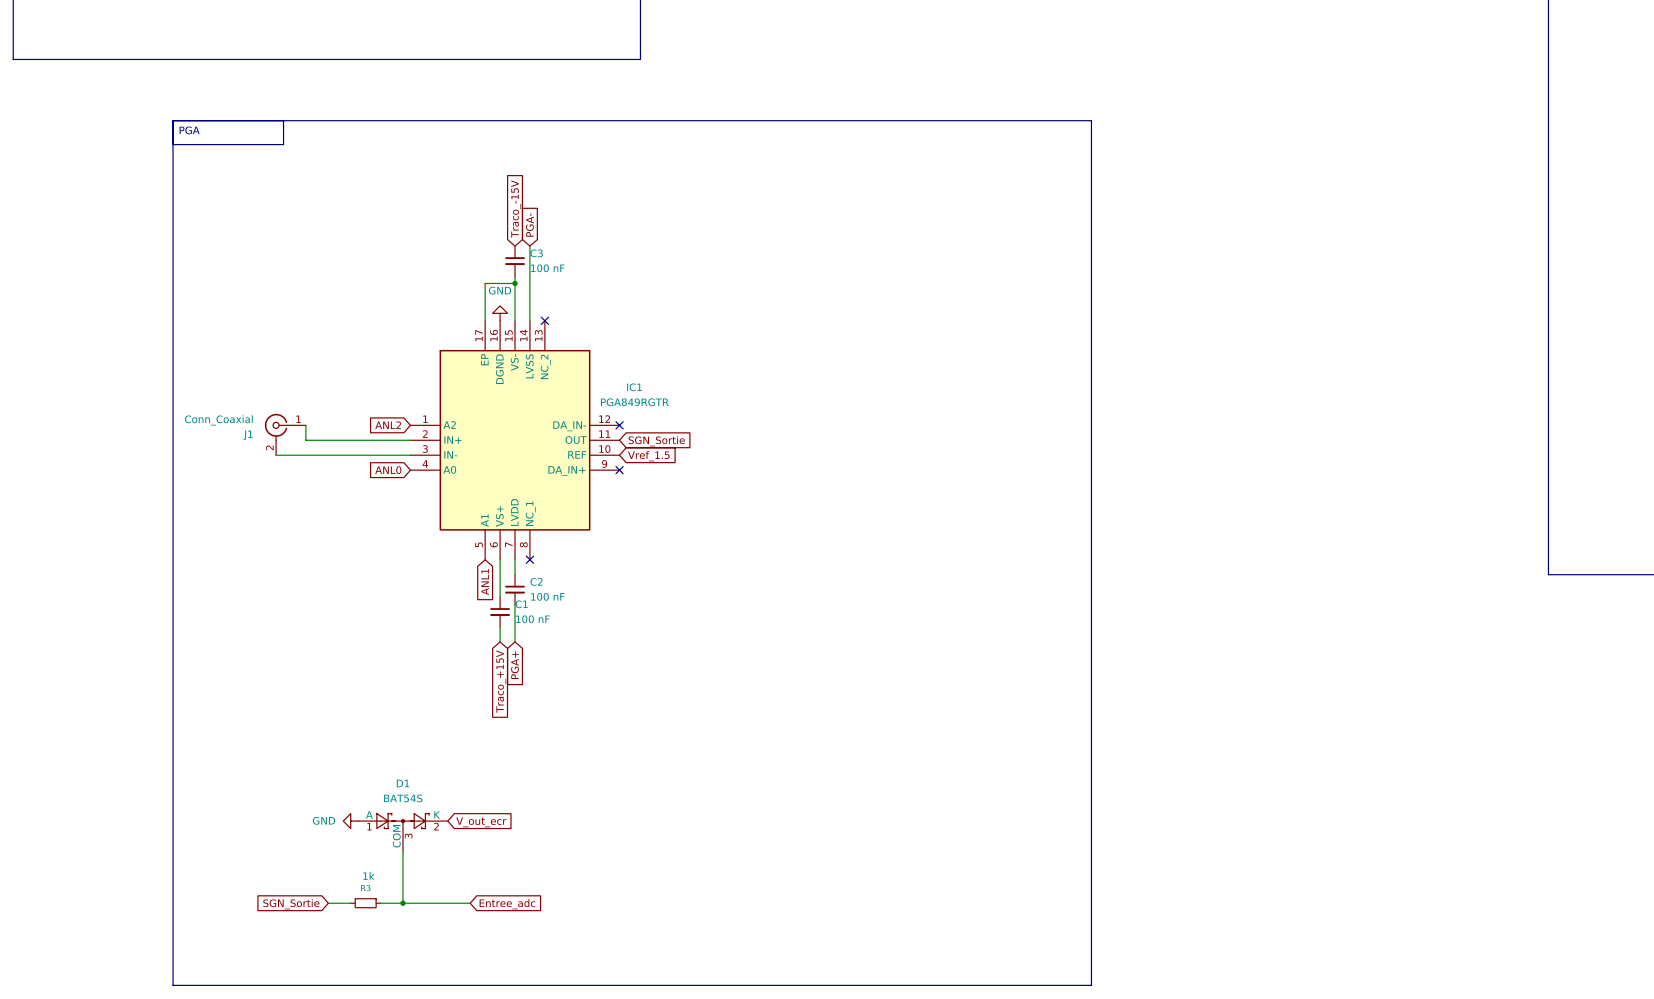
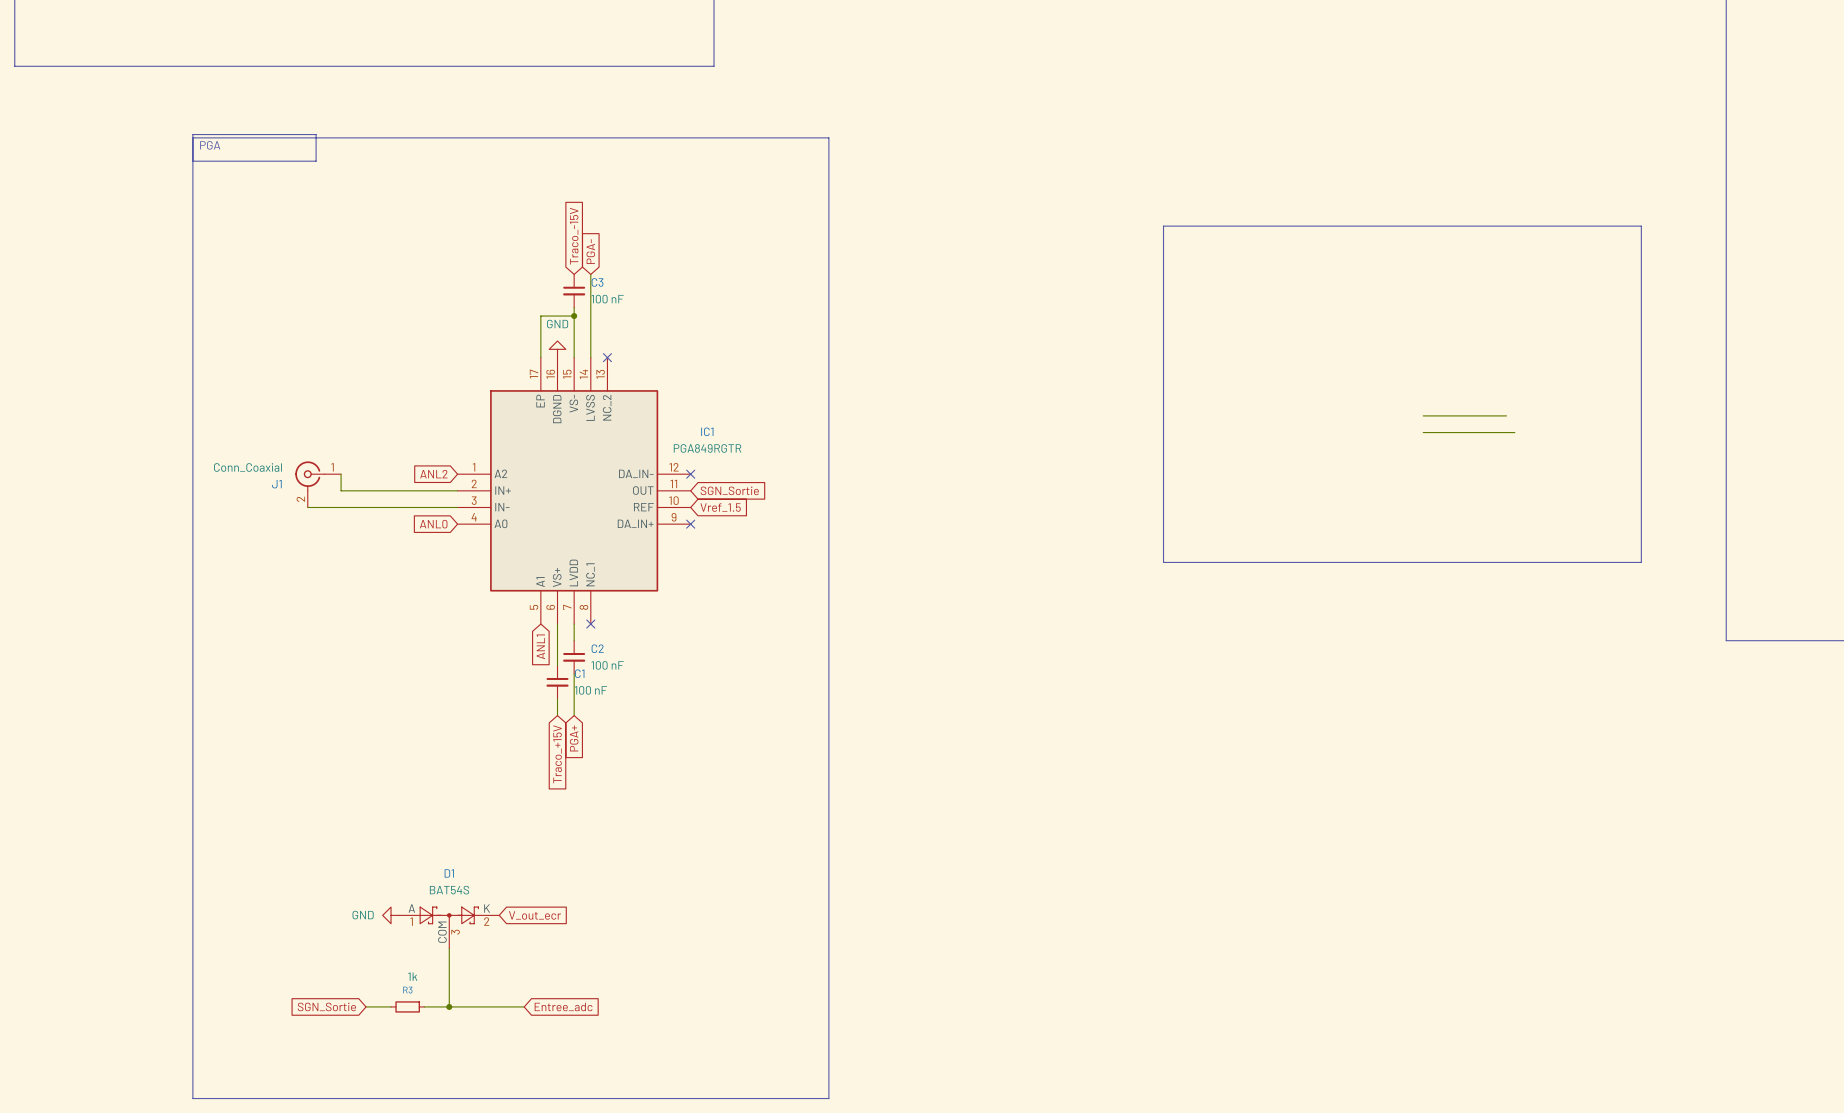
line: (283, 120) (1091, 120) (1091, 985) (743, 985) -> (192, 137) (828, 137) (828, 1098)
line: none -> (1163, 226) (1641, 226) (1641, 562) (1163, 562) (1163, 226)
wire: none -> (1423, 415) (1506, 415)
wire: none -> (1423, 432) (1514, 432)

